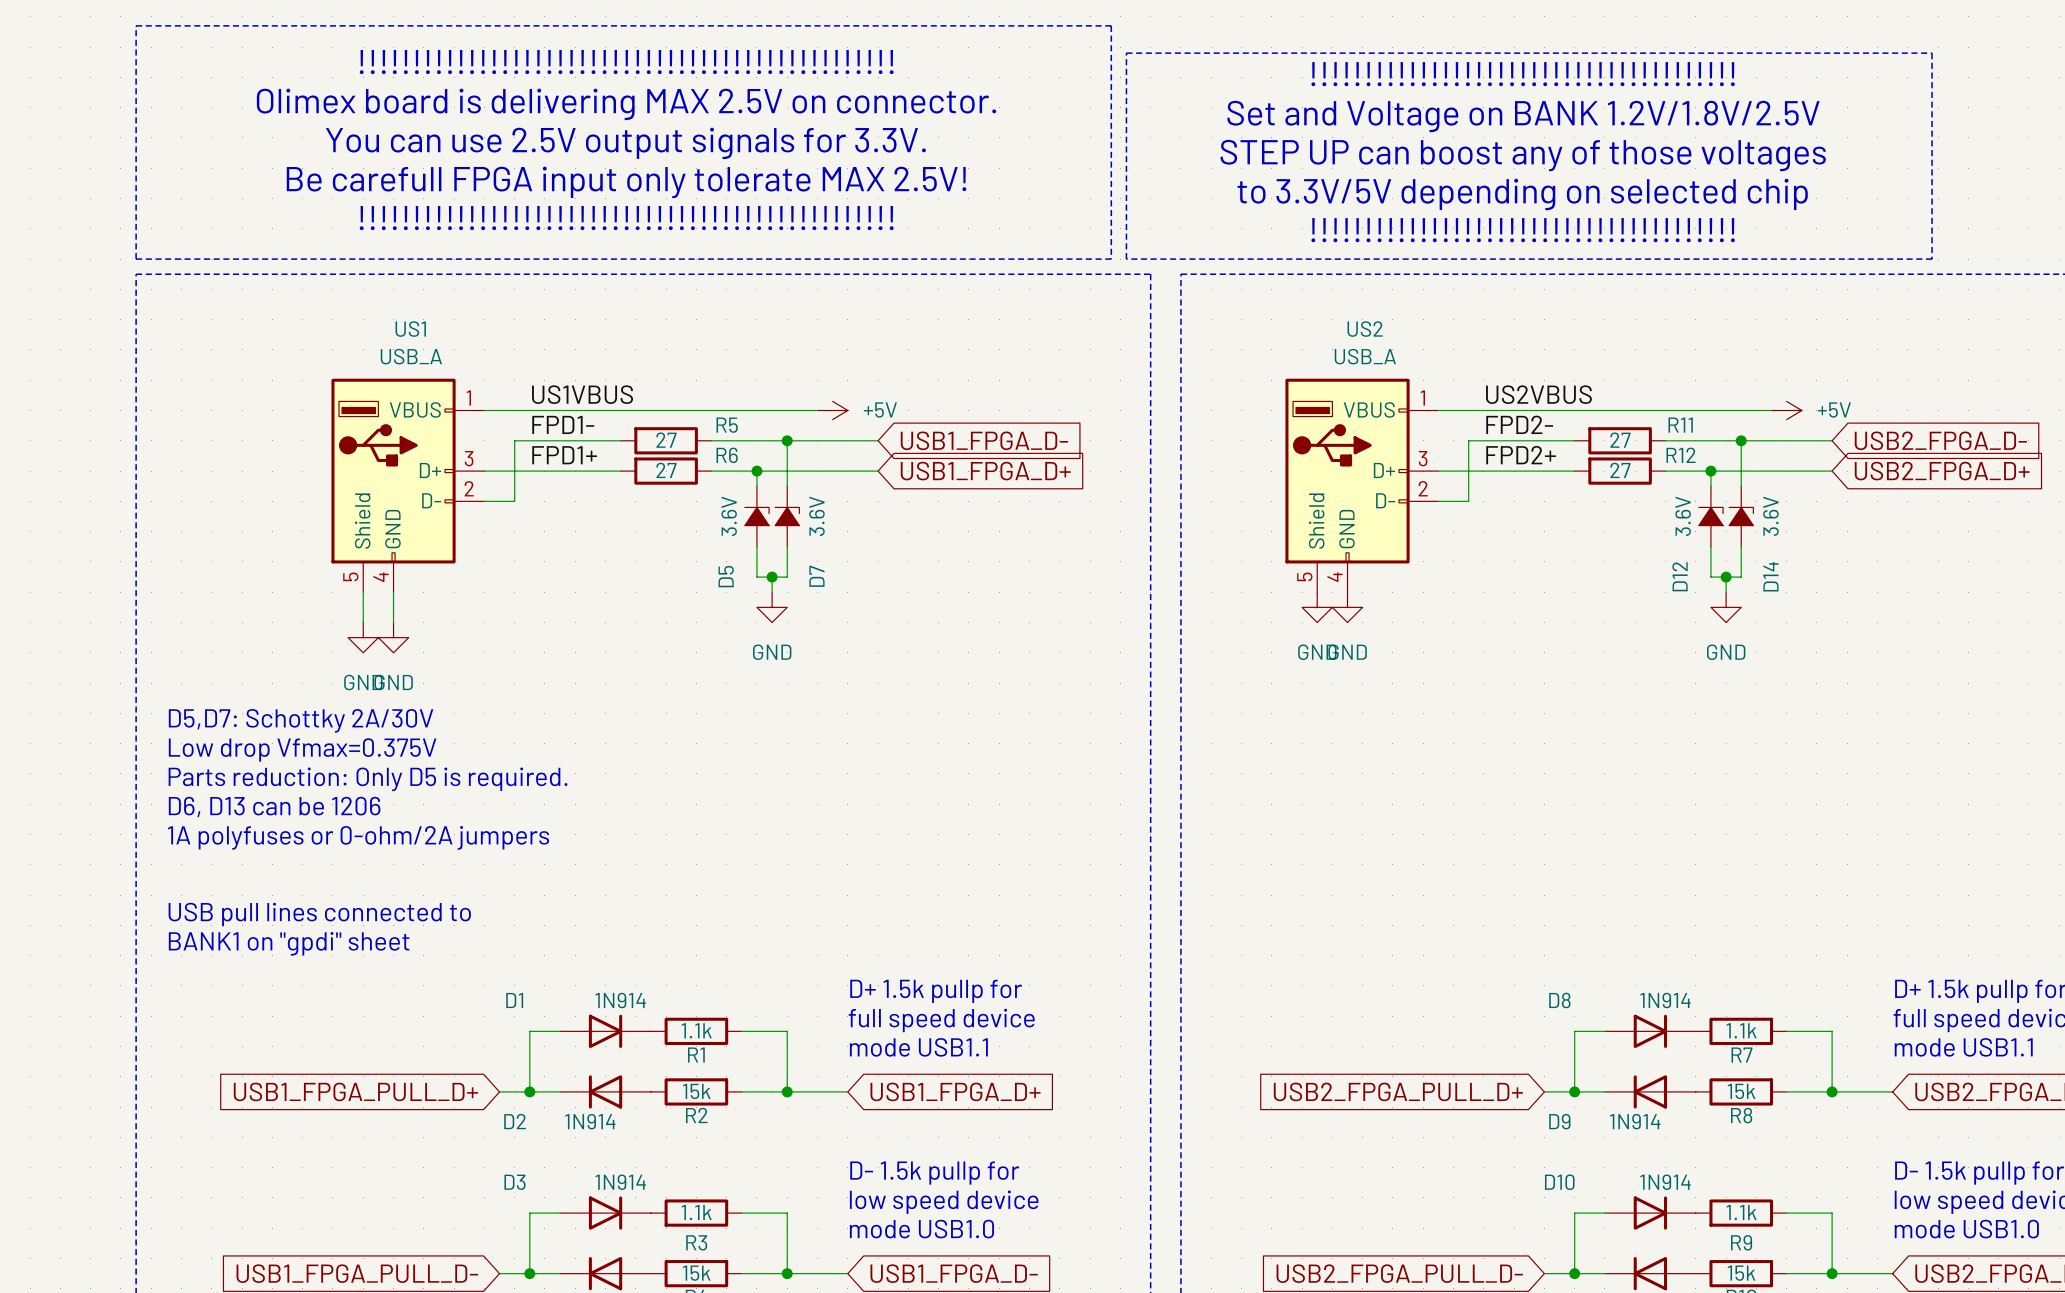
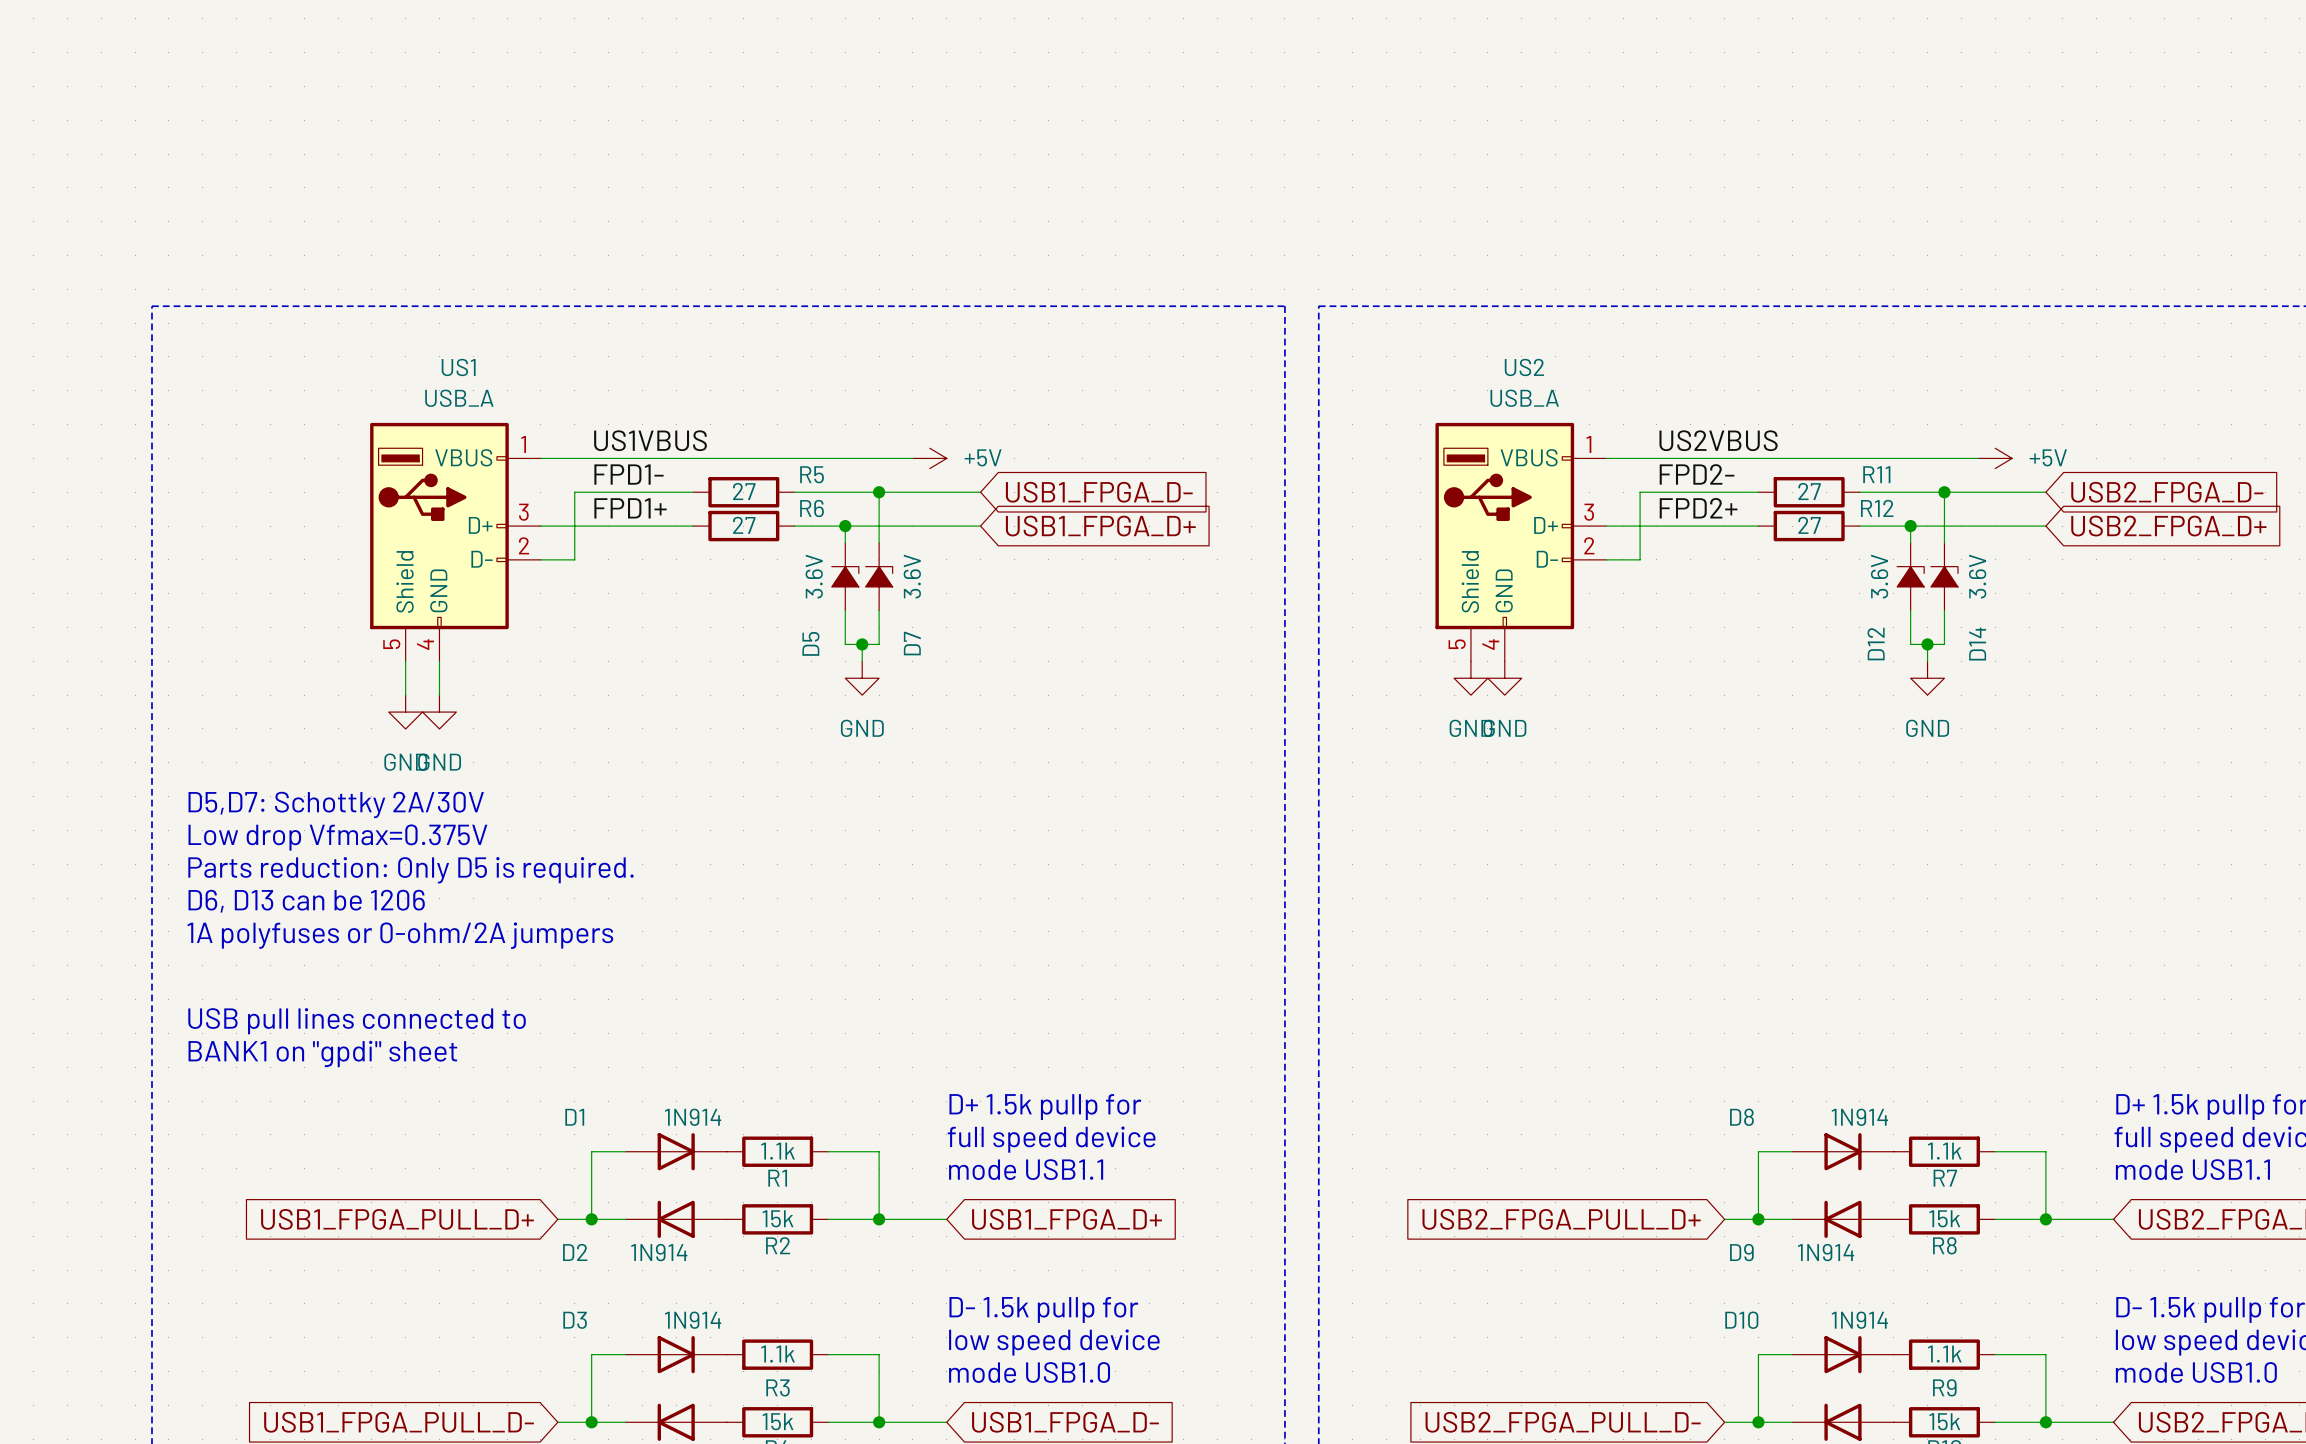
line: (136, 25) (1111, 25) (1111, 259) (136, 259) (136, 25) -> none
line: (1126, 53) (1932, 53) (1932, 259) (1126, 259) (1126, 53) -> none
text: !!!!!!!!!!!!!!!!!!!!!!!!!!!!!!!!!!!!!!!!!!!!!!!!! (626, 62) -> none
text: !!!!!!!!!!!!!!!!!!!!!!!!!!!!!!!!!!!!!!! (1523, 74) -> none
text: Olimex board is delivering MAX 2.5V on connector. (626, 104) -> none
text: Set and Voltage on BANK 1.2V/1.8V/2.5V (1523, 116) -> none
text: You can use 2.5V output signals for 3.3V. (625, 143) -> none
text: STEP UP can boost any of those voltages (1523, 155) -> none
text: Be carefull FPGA input only tolerate MAX 2.5V! (626, 182) -> none
text: to 3.3V/5V depending on selected chip (1522, 194) -> none
text: !!!!!!!!!!!!!!!!!!!!!!!!!!!!!!!!!!!!!!!!!!!!!!!!! (626, 218) -> none
text: !!!!!!!!!!!!!!!!!!!!!!!!!!!!!!!!!!!!!!! (1523, 230) -> none

